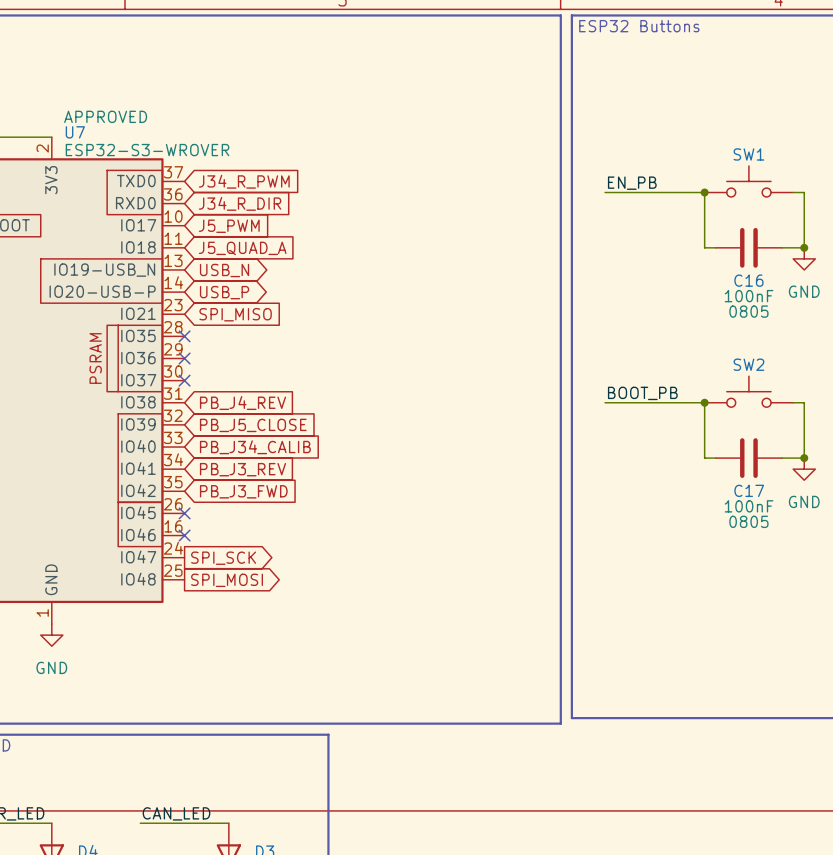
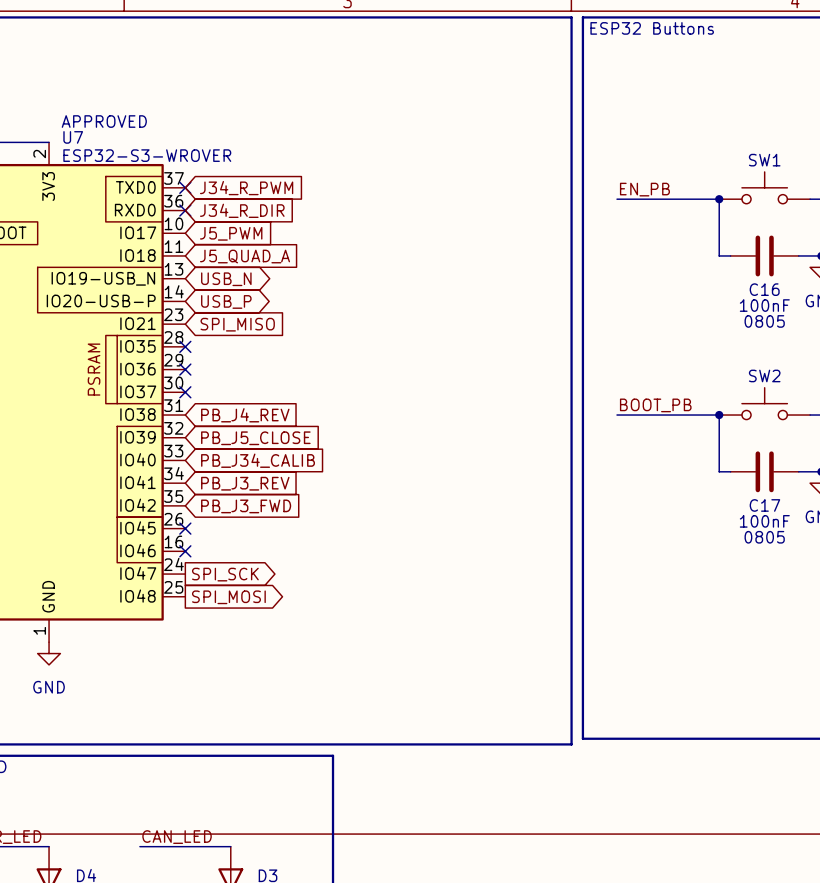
no-connect mark: none -> (185, 187)
no-connect mark: none -> (185, 210)

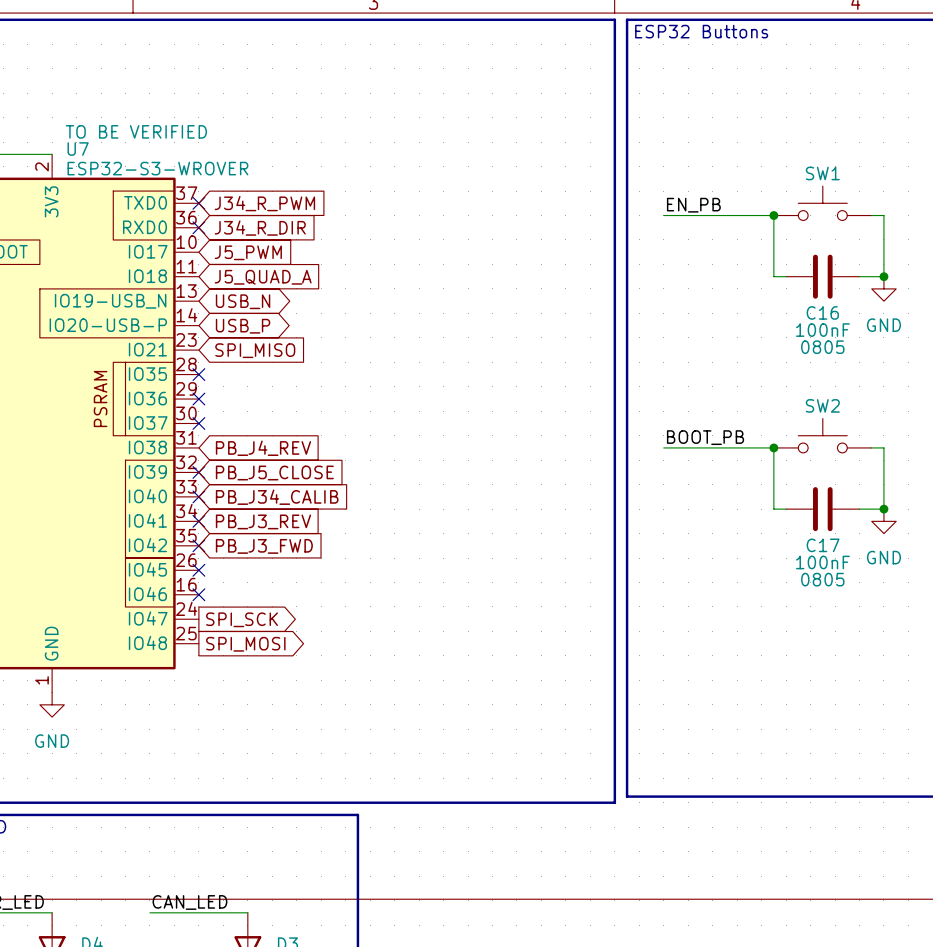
U7 text: APPROVED (104, 121) -> TO BE VERIFIED (136, 131)
no-connect mark: none -> (198, 472)
no-connect mark: none -> (198, 496)
no-connect mark: none -> (198, 521)
no-connect mark: none -> (198, 545)

